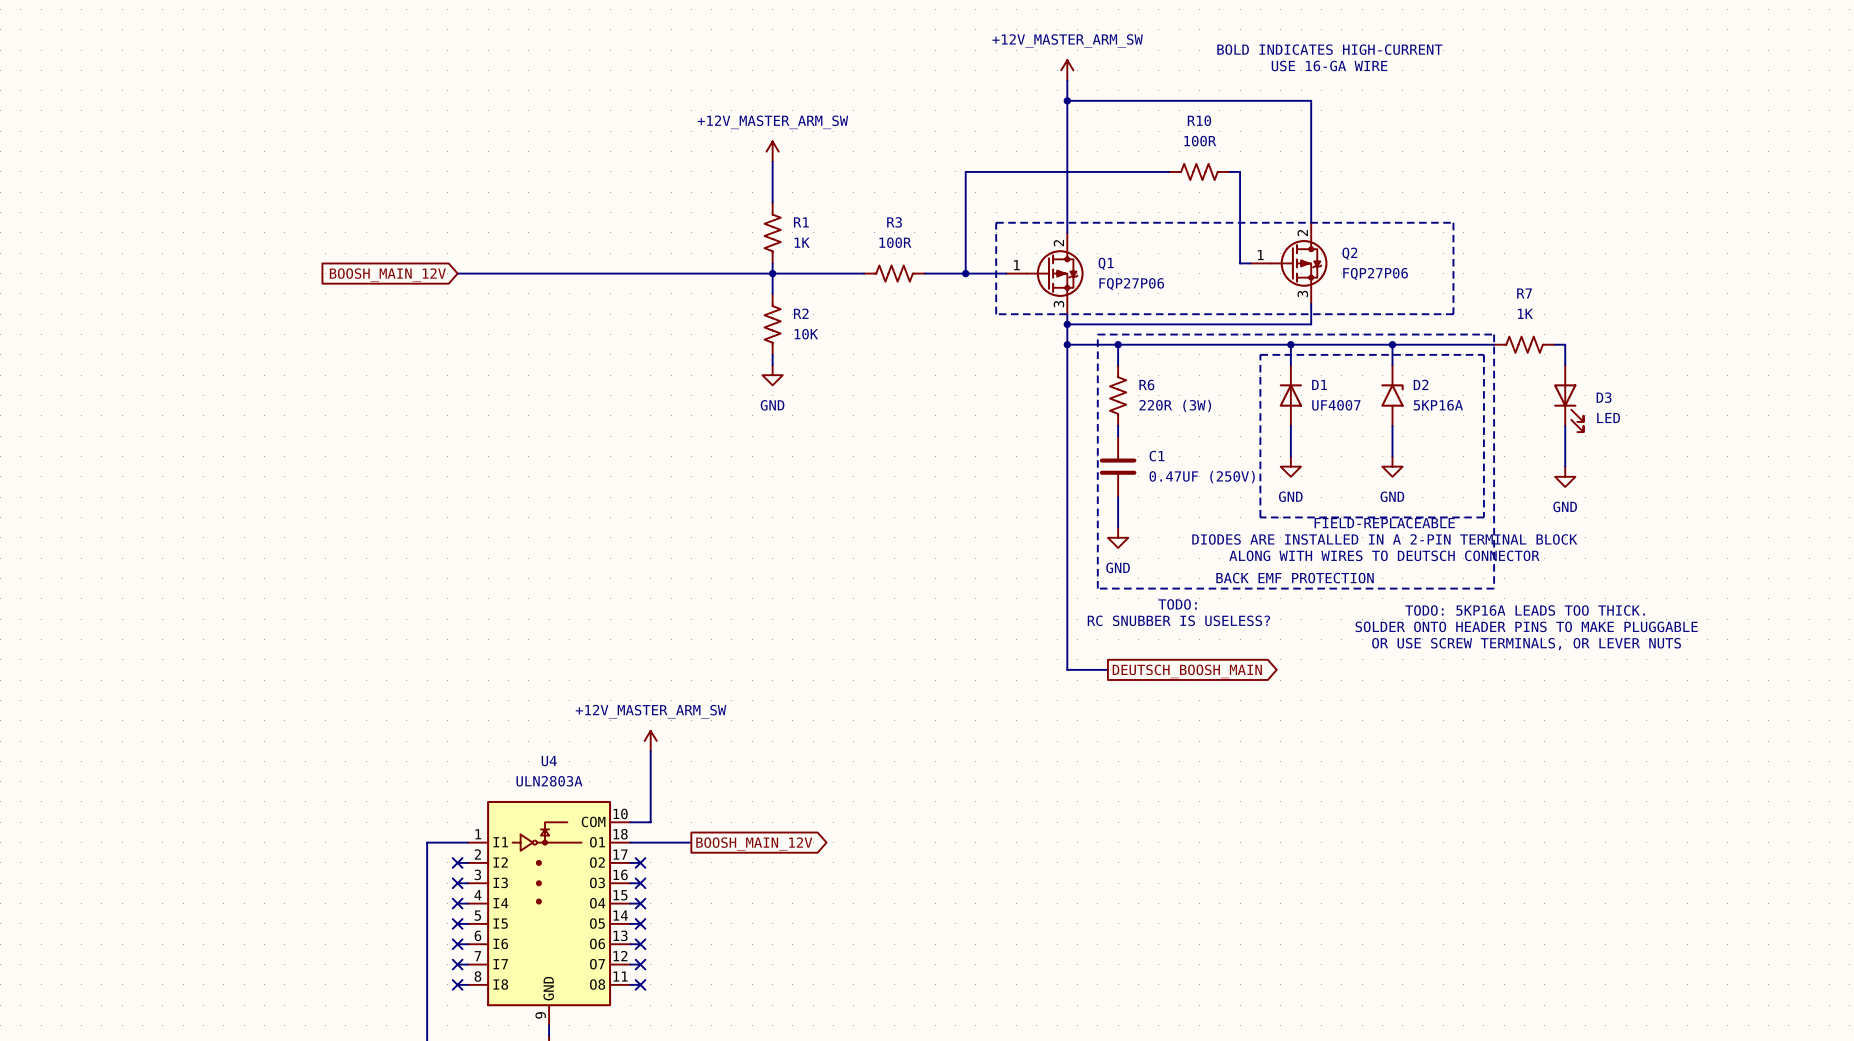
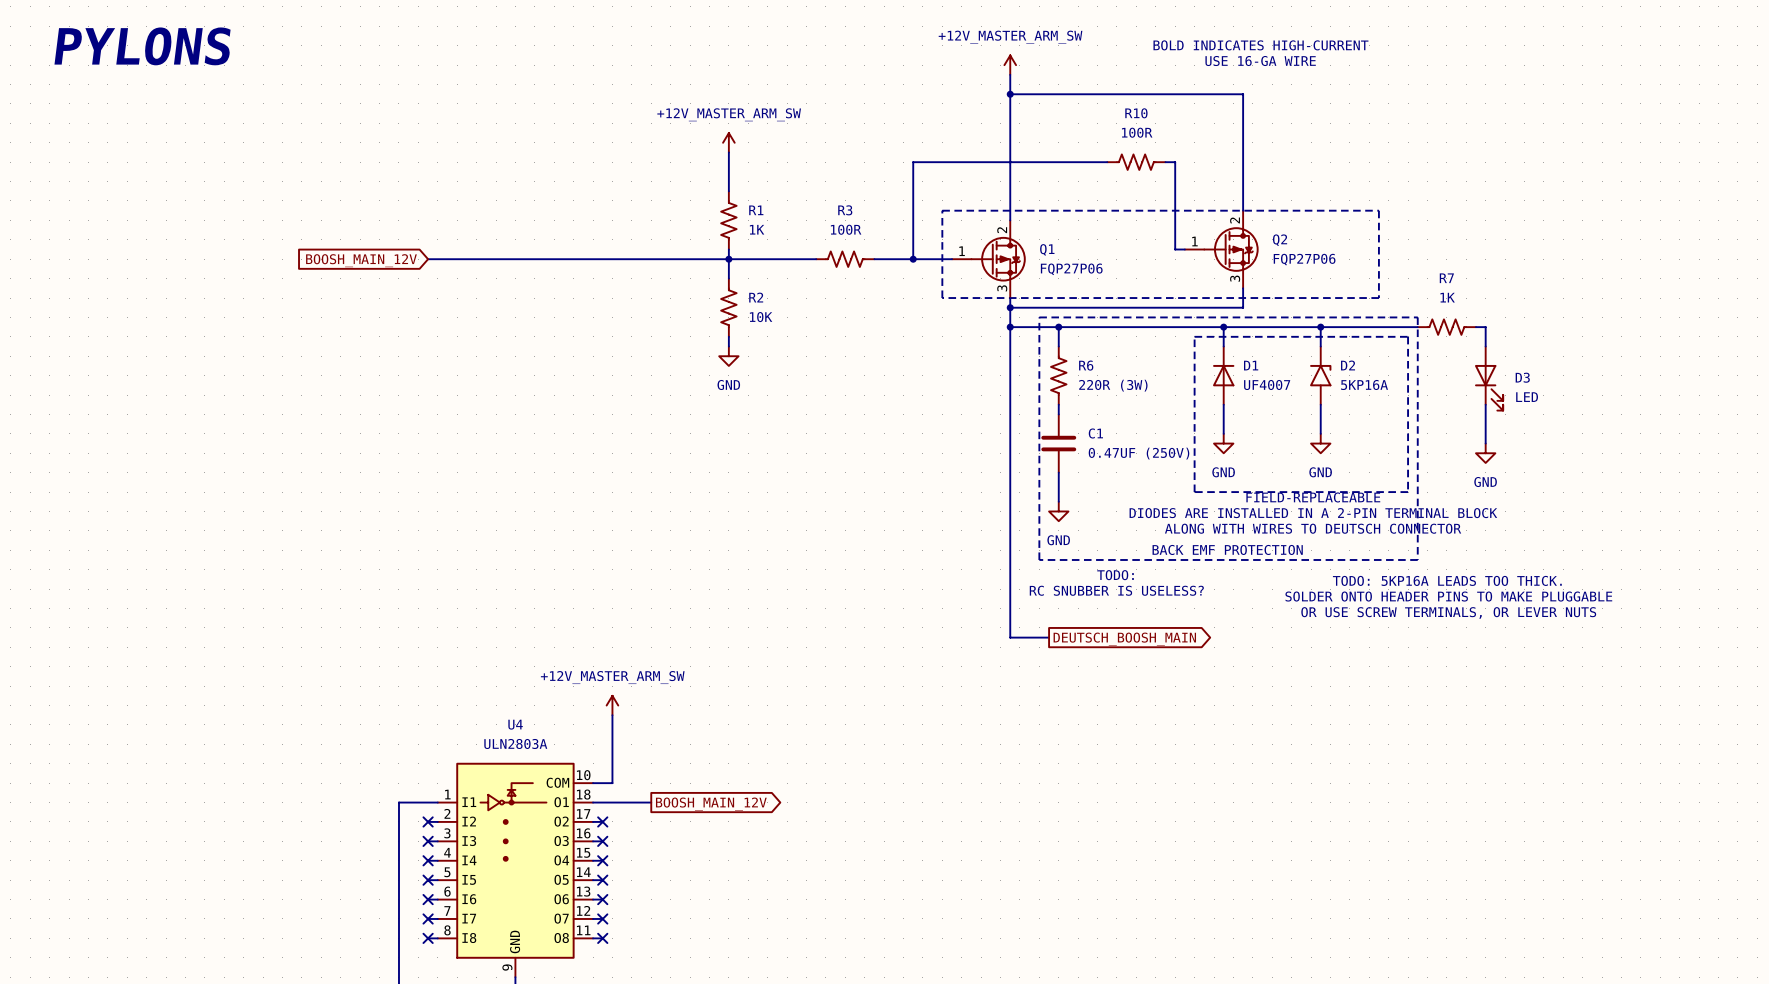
text: none -> PYLONS (142, 46)

